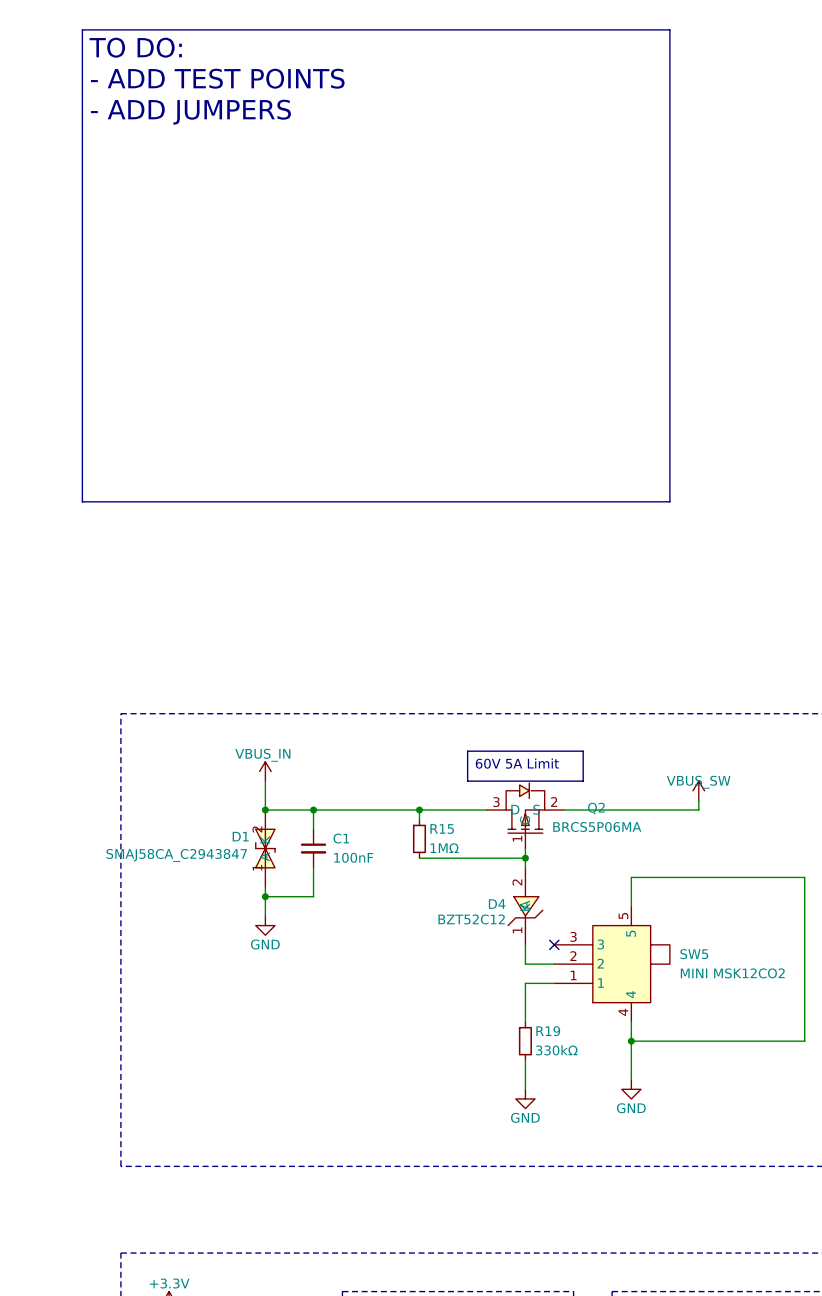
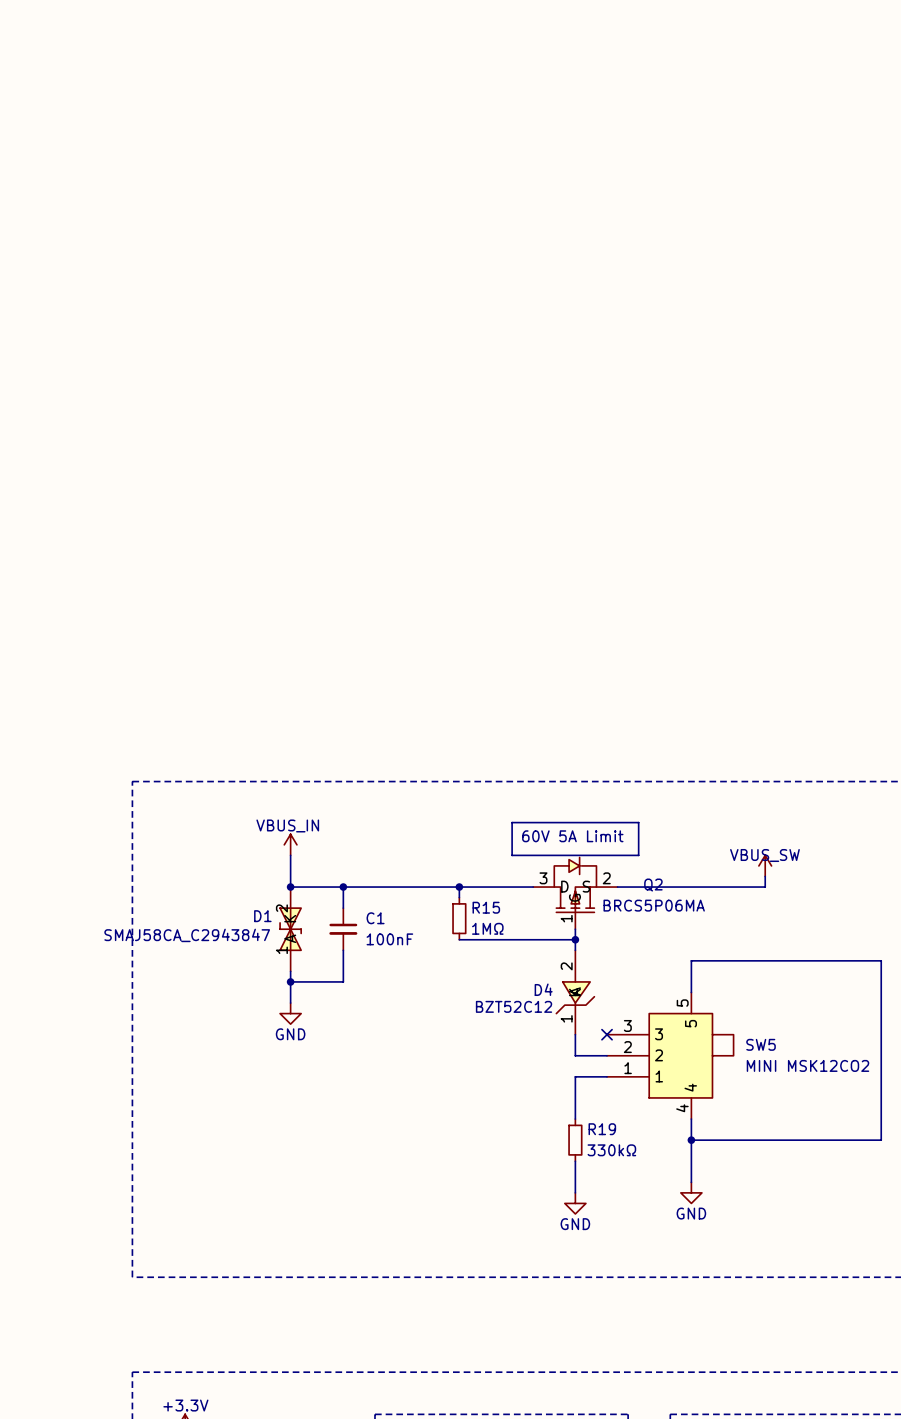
line: (82, 29) (669, 29) (669, 501) (82, 501) (82, 29) -> none
text: TO DO: (135, 47) -> none
text: - ADD TEST POINTS (217, 78) -> none
text: - ADD JUMPERS (190, 112) -> none

